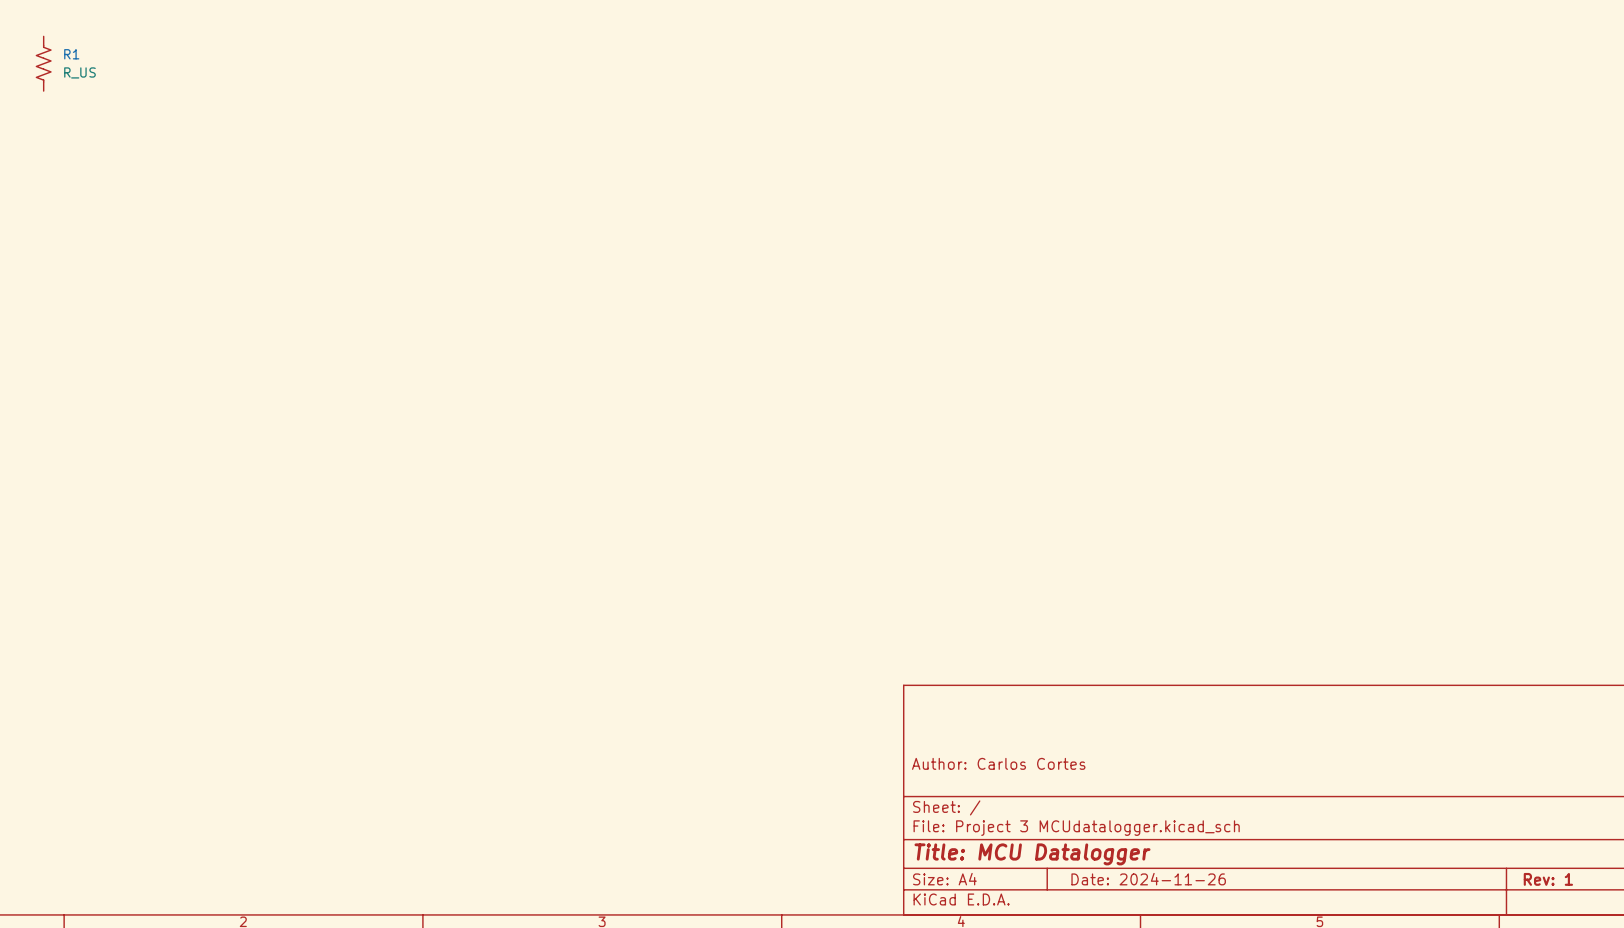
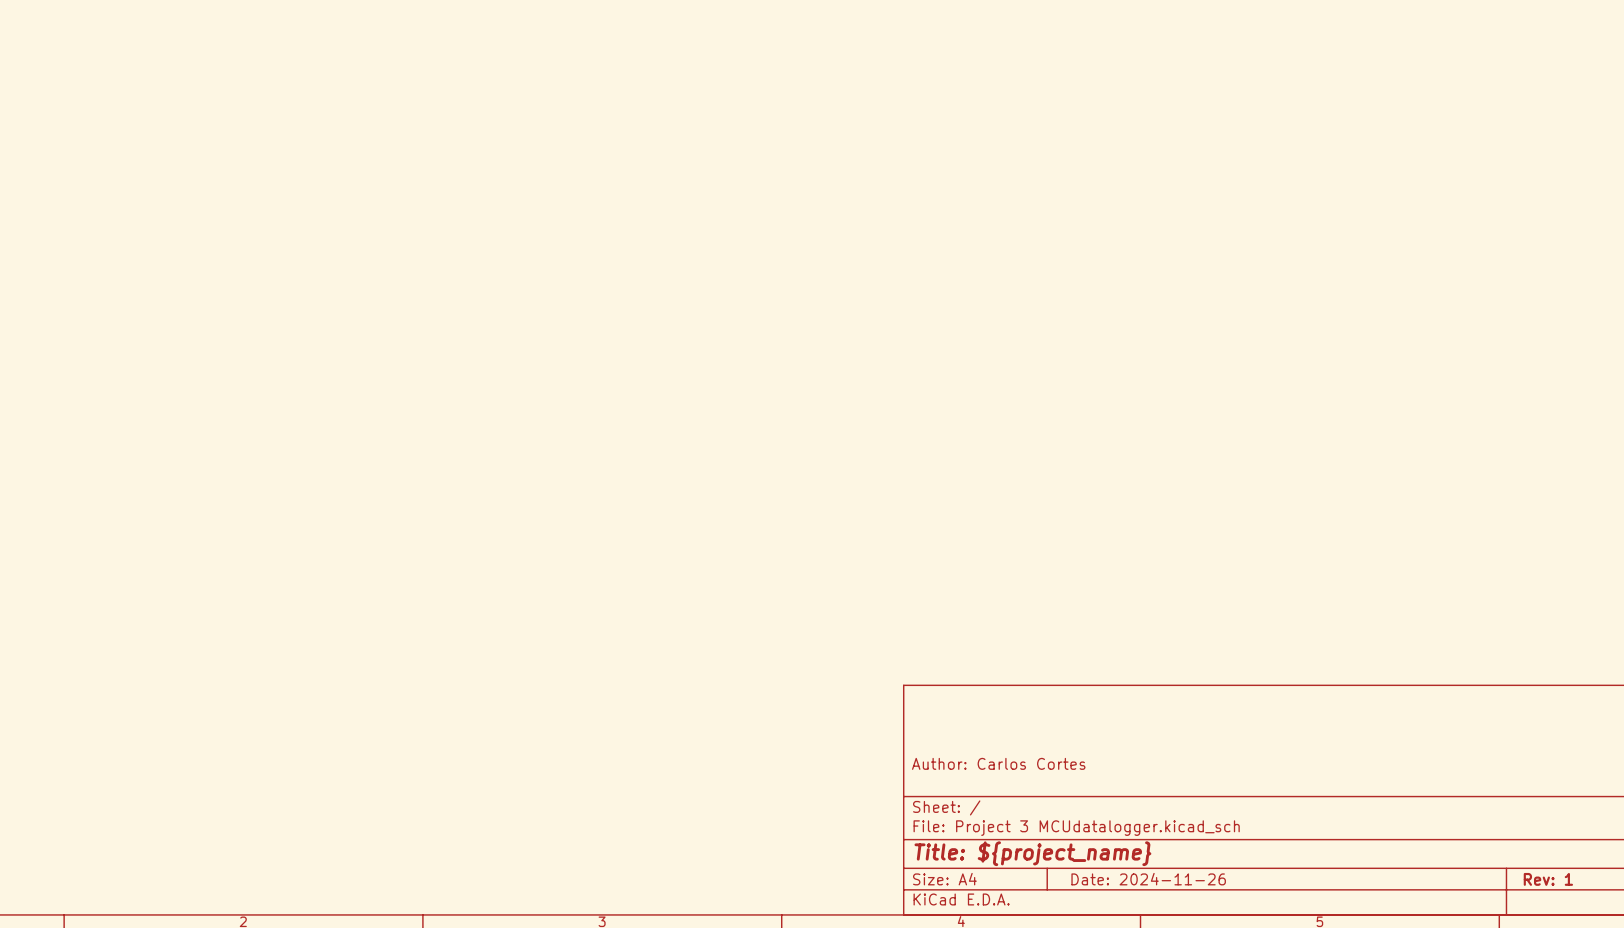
R1: R_US (43, 63) -> none
title block: Title: MCU Datalogger (1032, 854) -> Title: ${project_name} (1032, 853)

